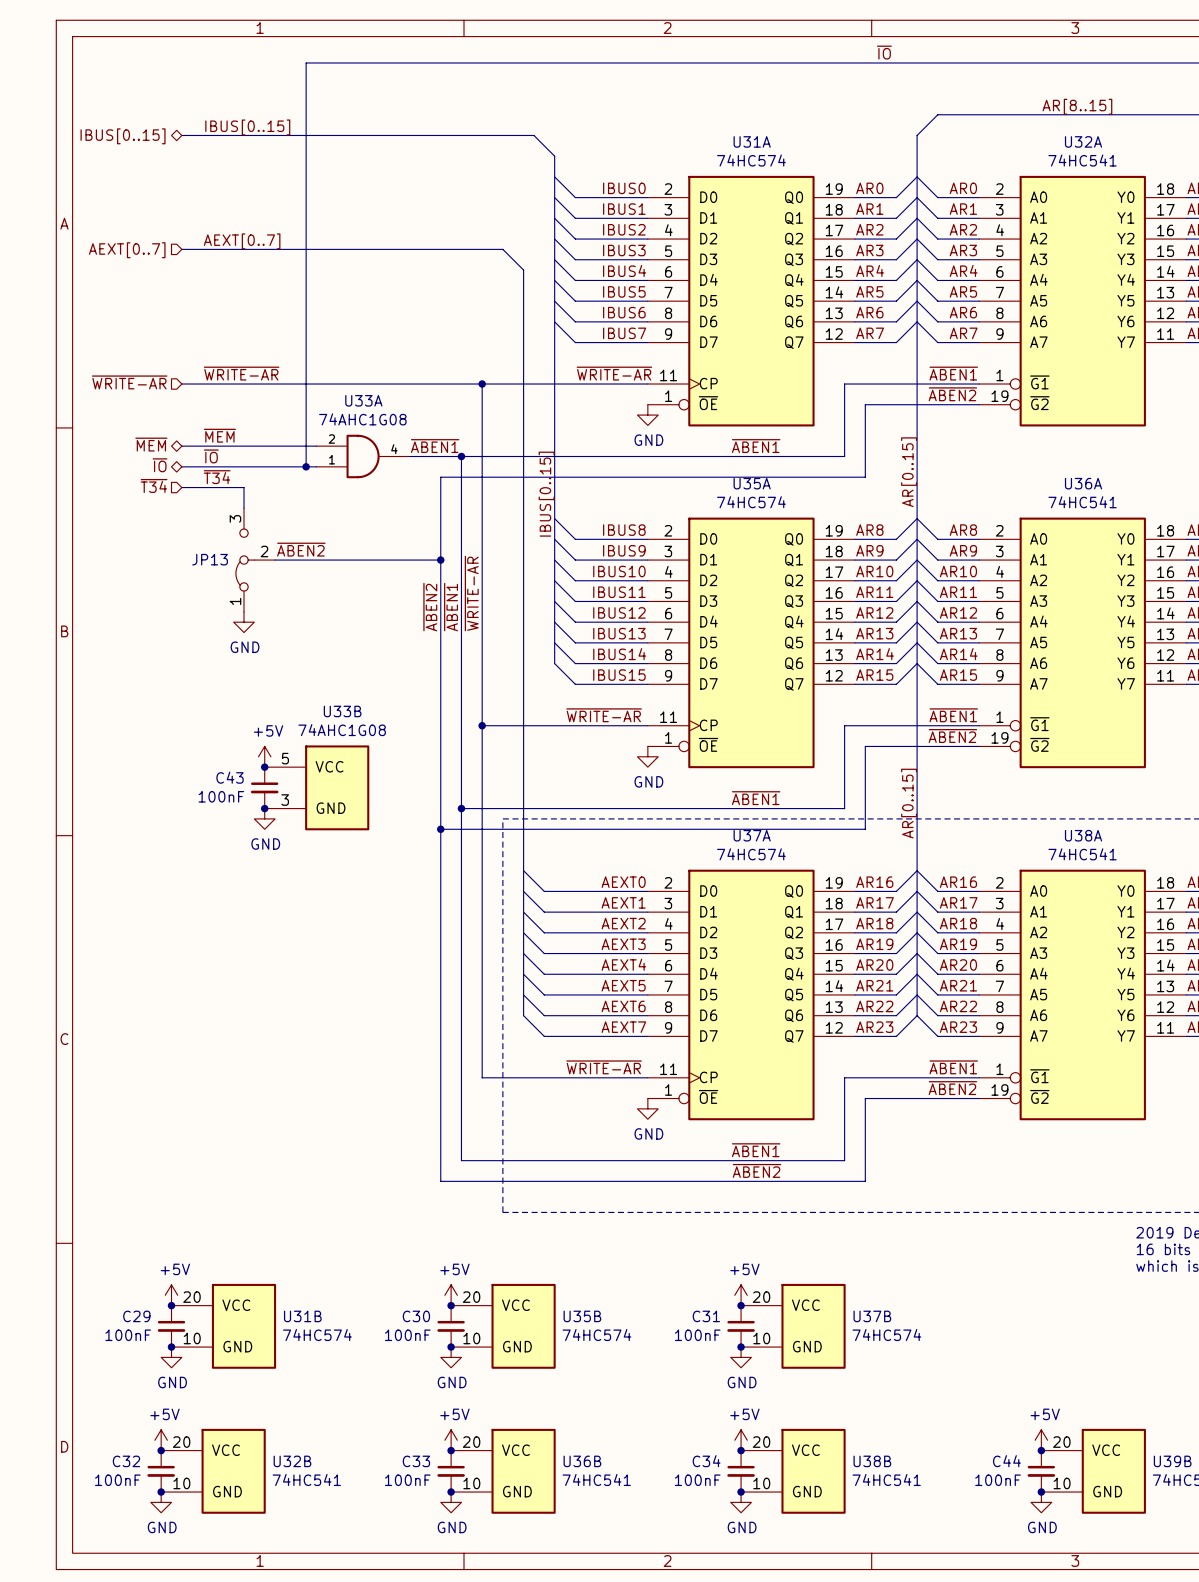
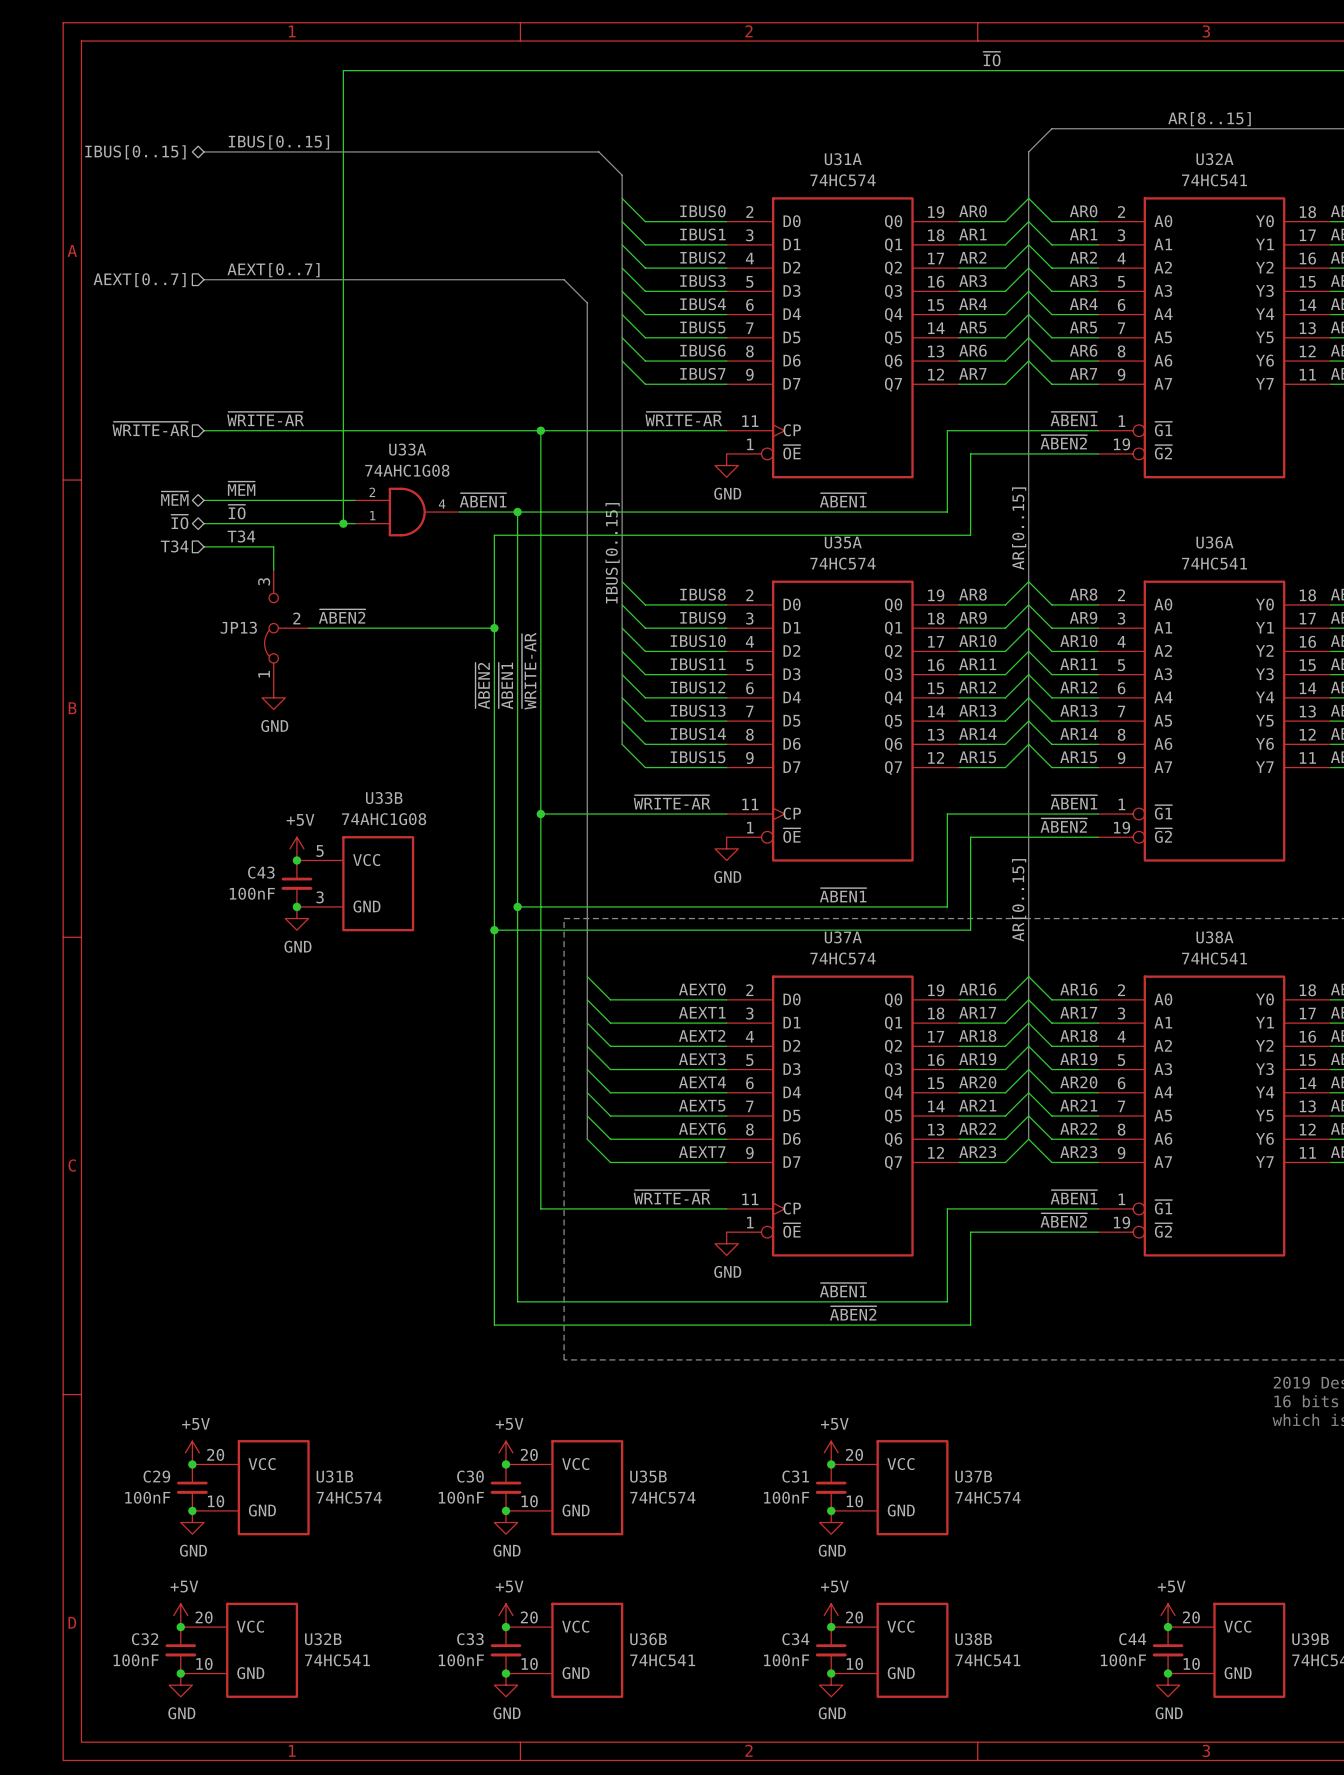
label: ~{T34} (217, 477) -> T34 (241, 536)
hierarchical label: ~{T34} (154, 485) -> T34 (174, 546)

